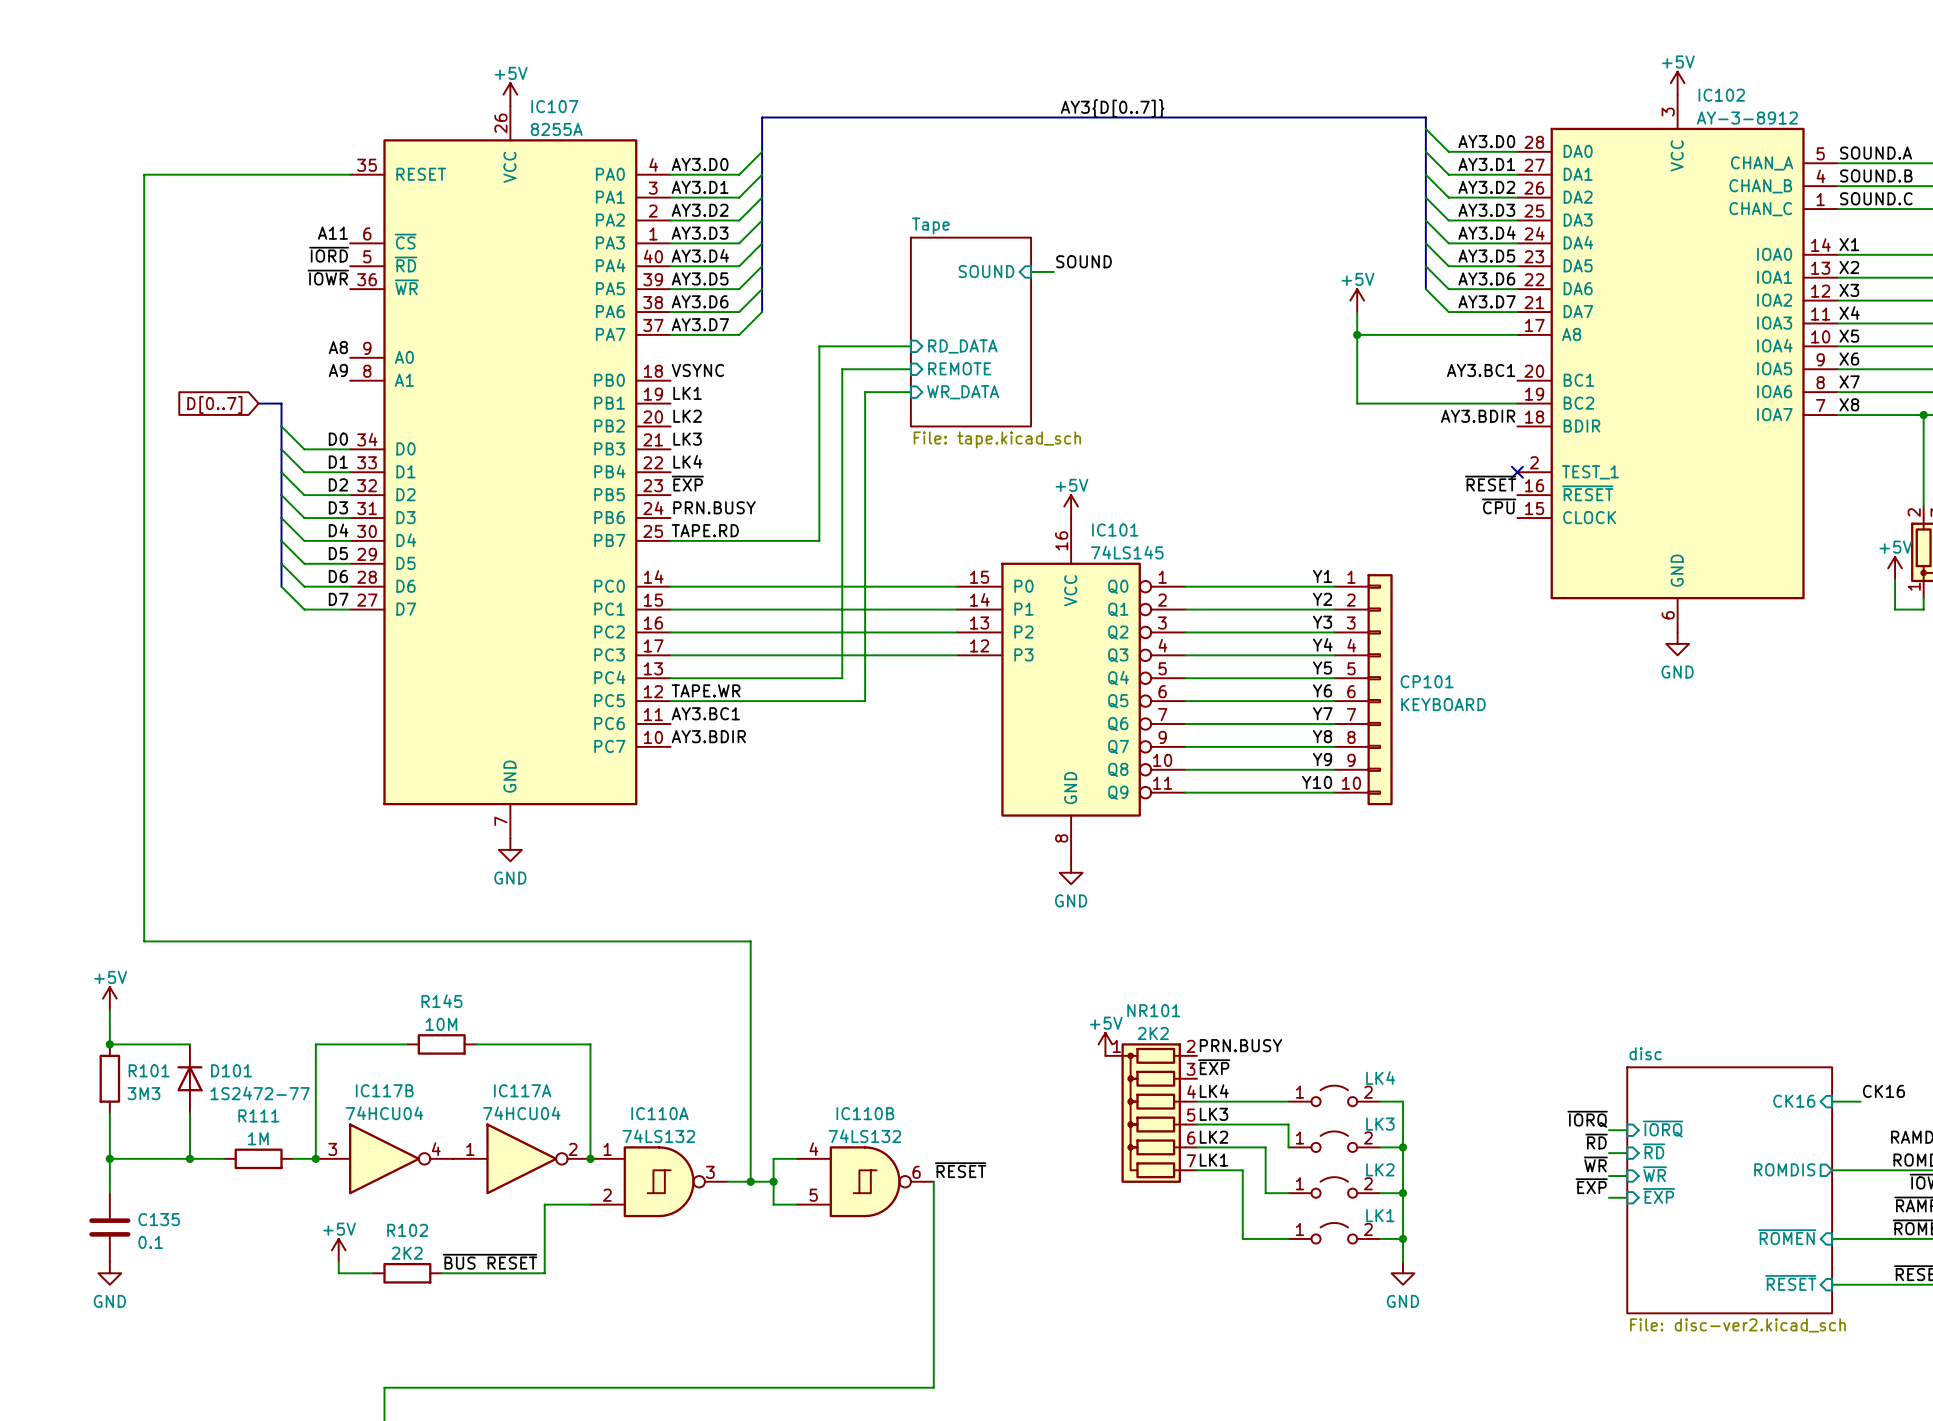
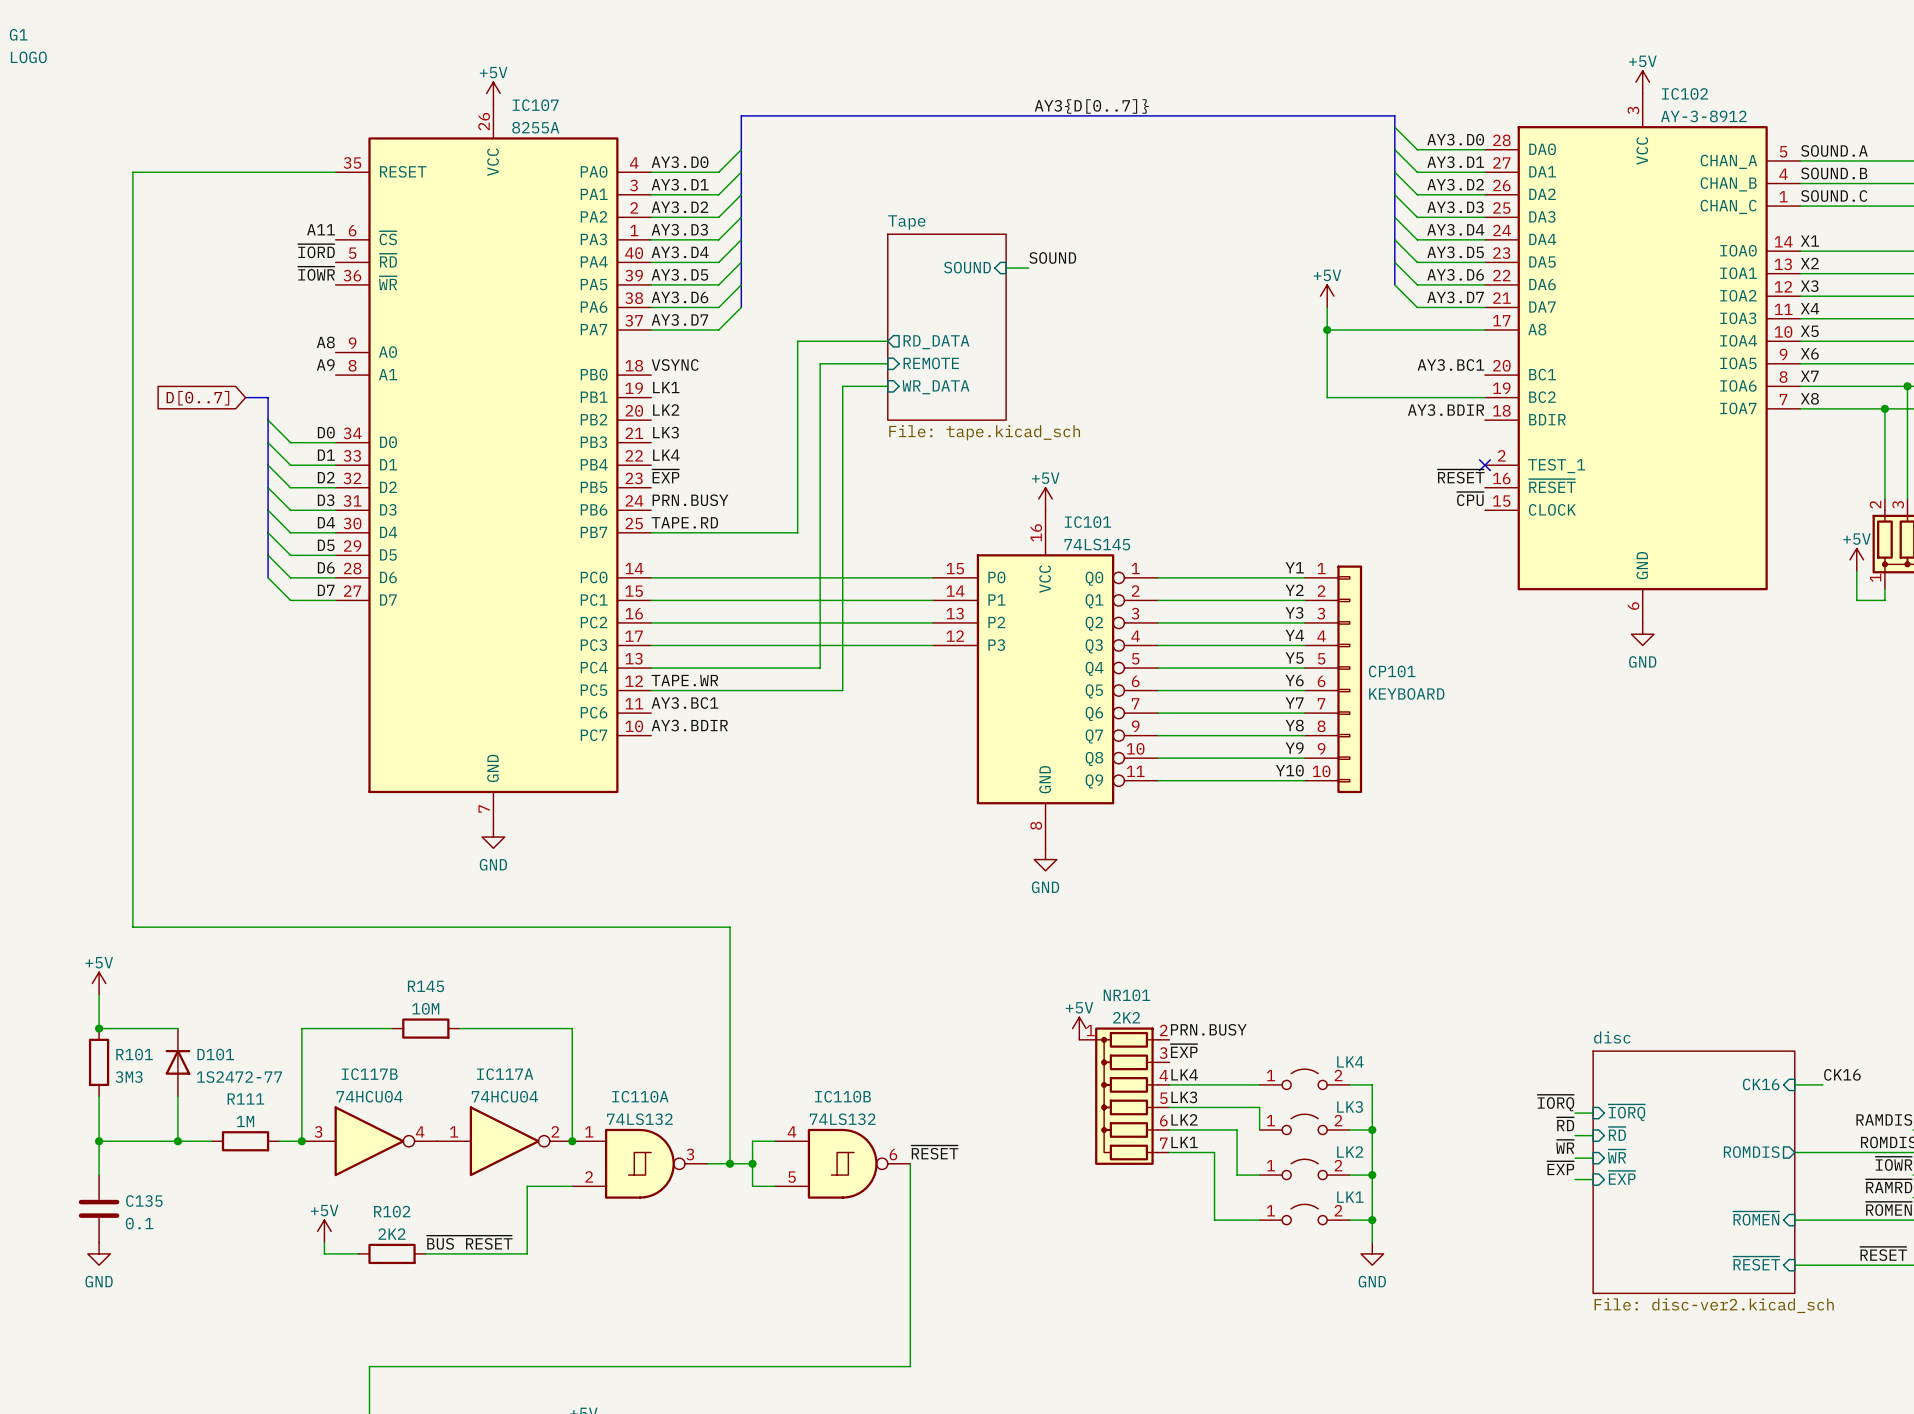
G1: none -> LOGO (28, 46)
sheet pin shape: input (962, 346) -> output (936, 342)

